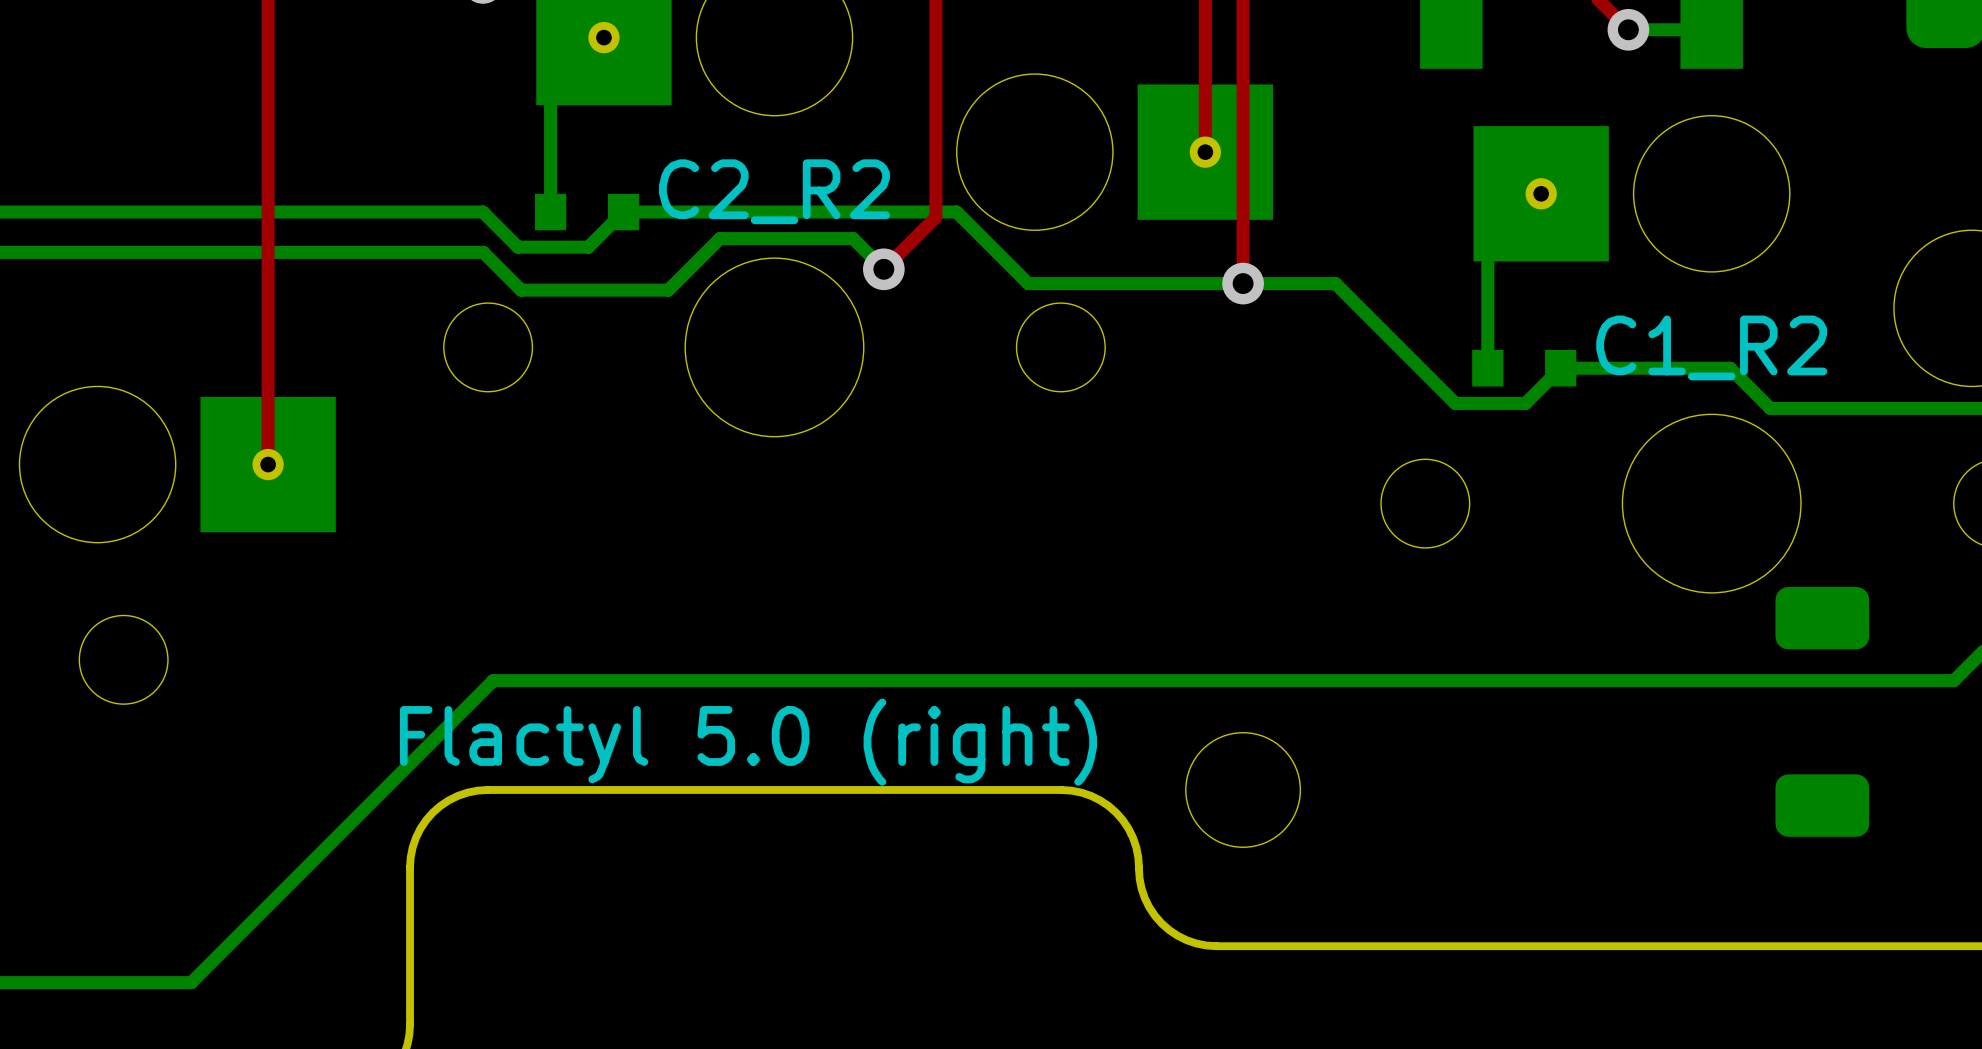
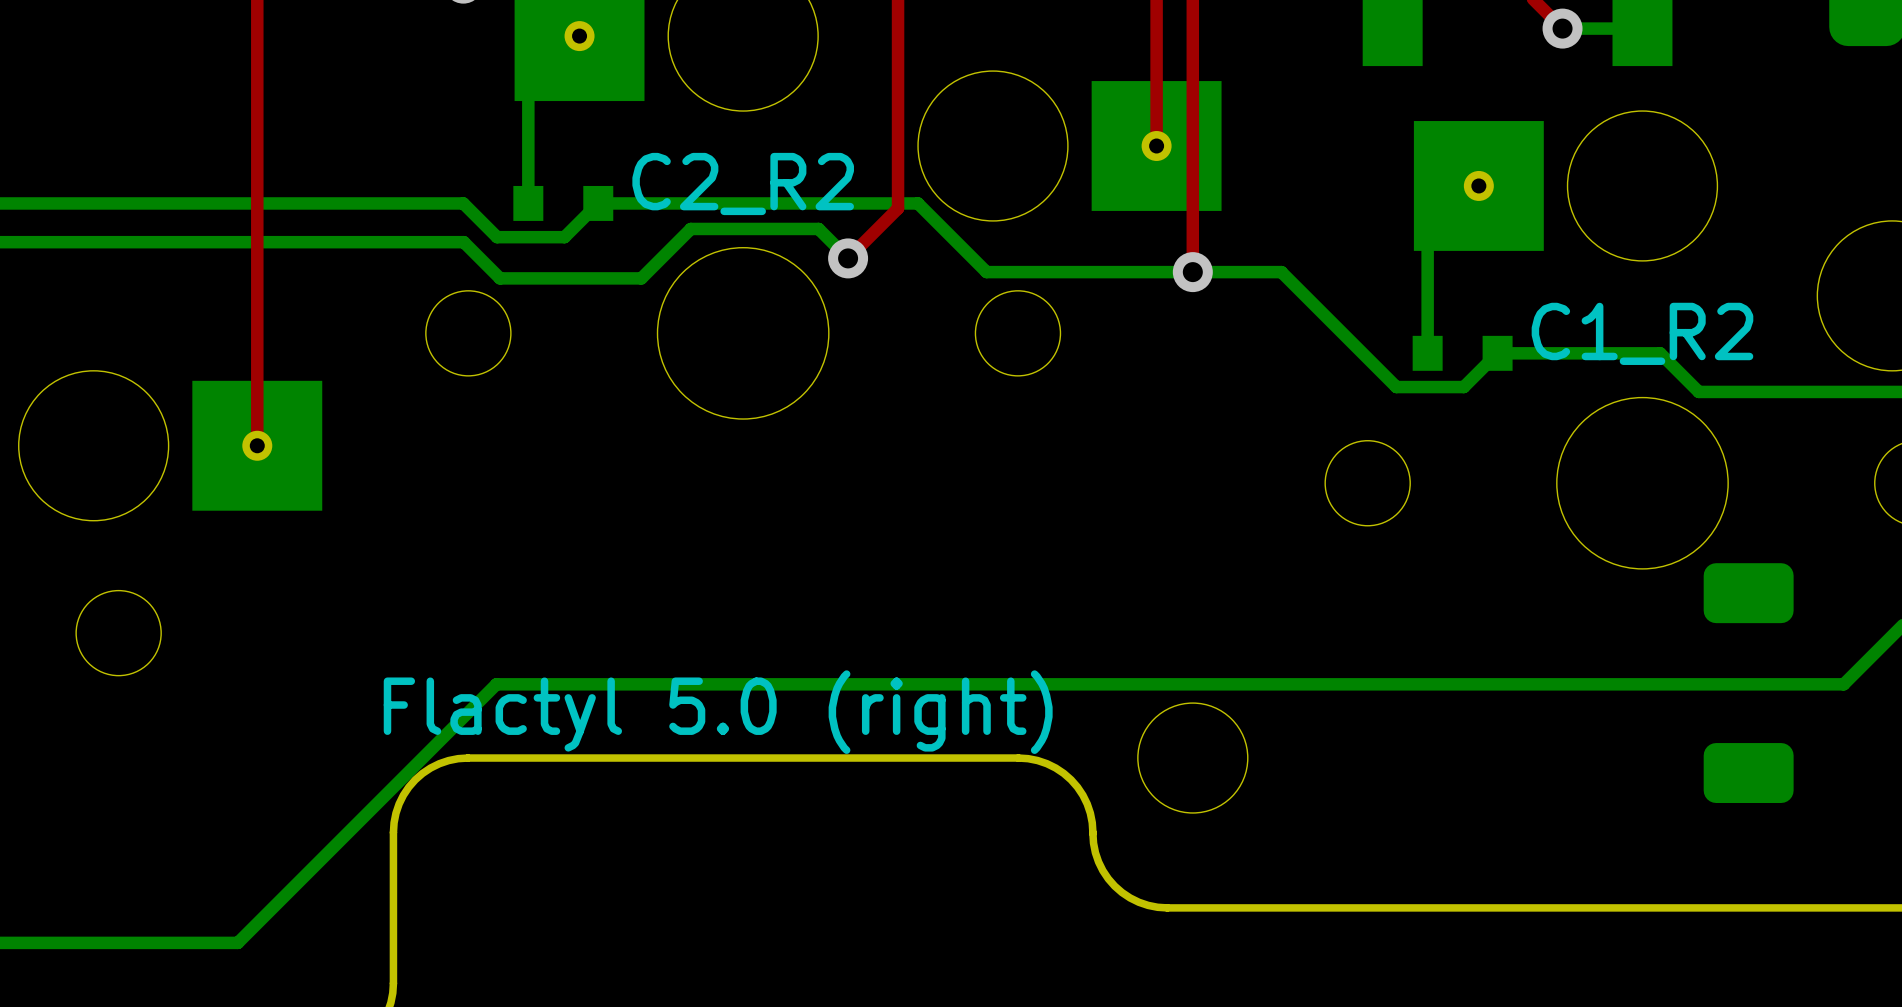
bottom track: (1953, 680) (493, 680) (191, 982) -> (1874, 653) (1843, 684) (496, 684) (237, 942) (183, 942)

